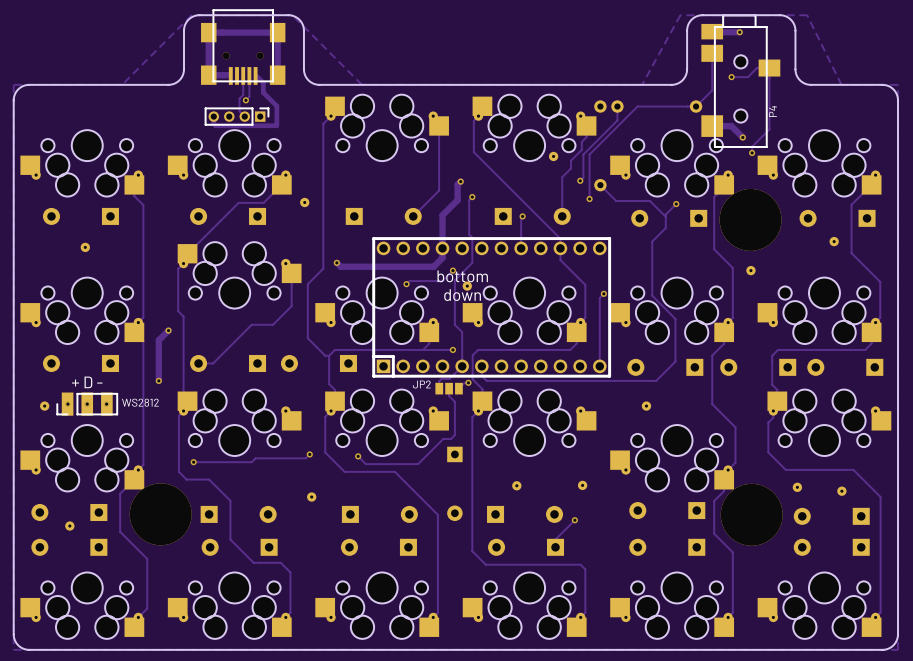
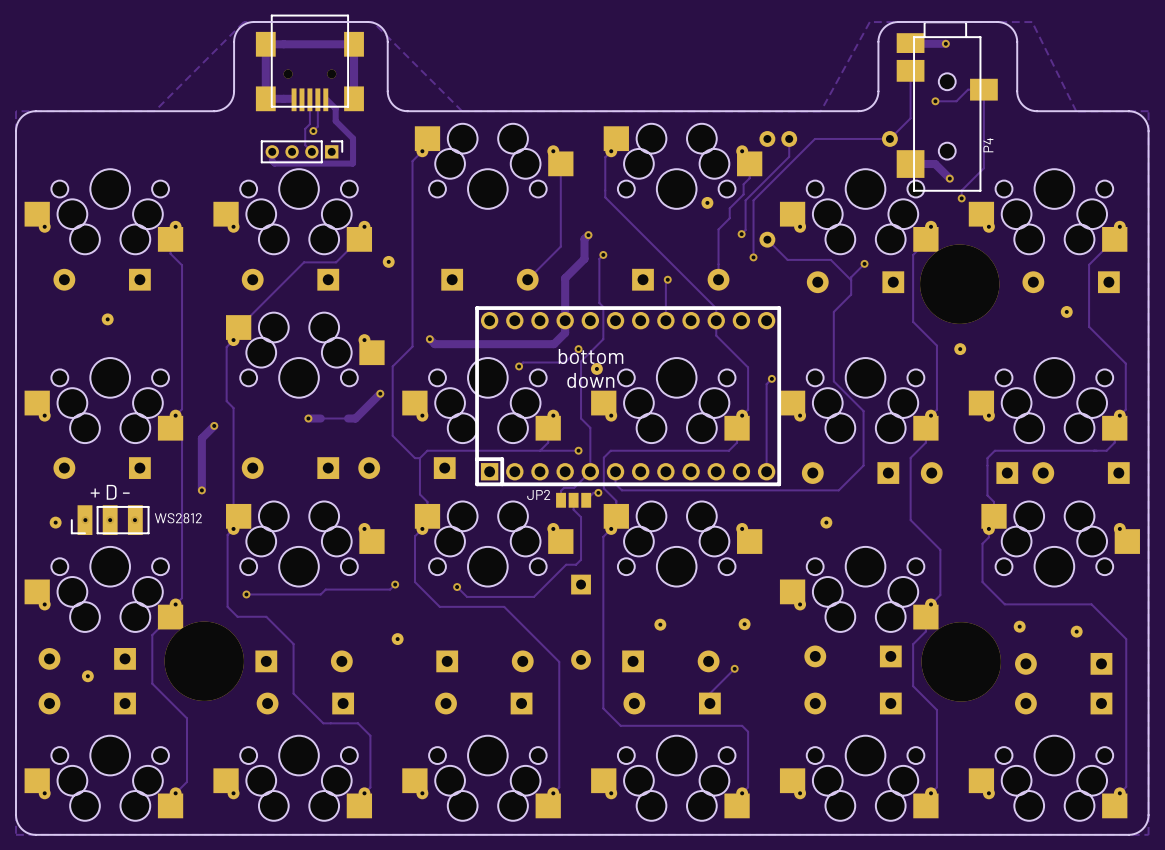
track: (291, 273) (291, 306) (273, 324) -> (380, 393) (355, 418) (348, 418)
via: none -> (380, 393)
via: none -> (308, 418)
track: (251, 324) (213, 363) (198, 363) -> (320, 418) (308, 418)

